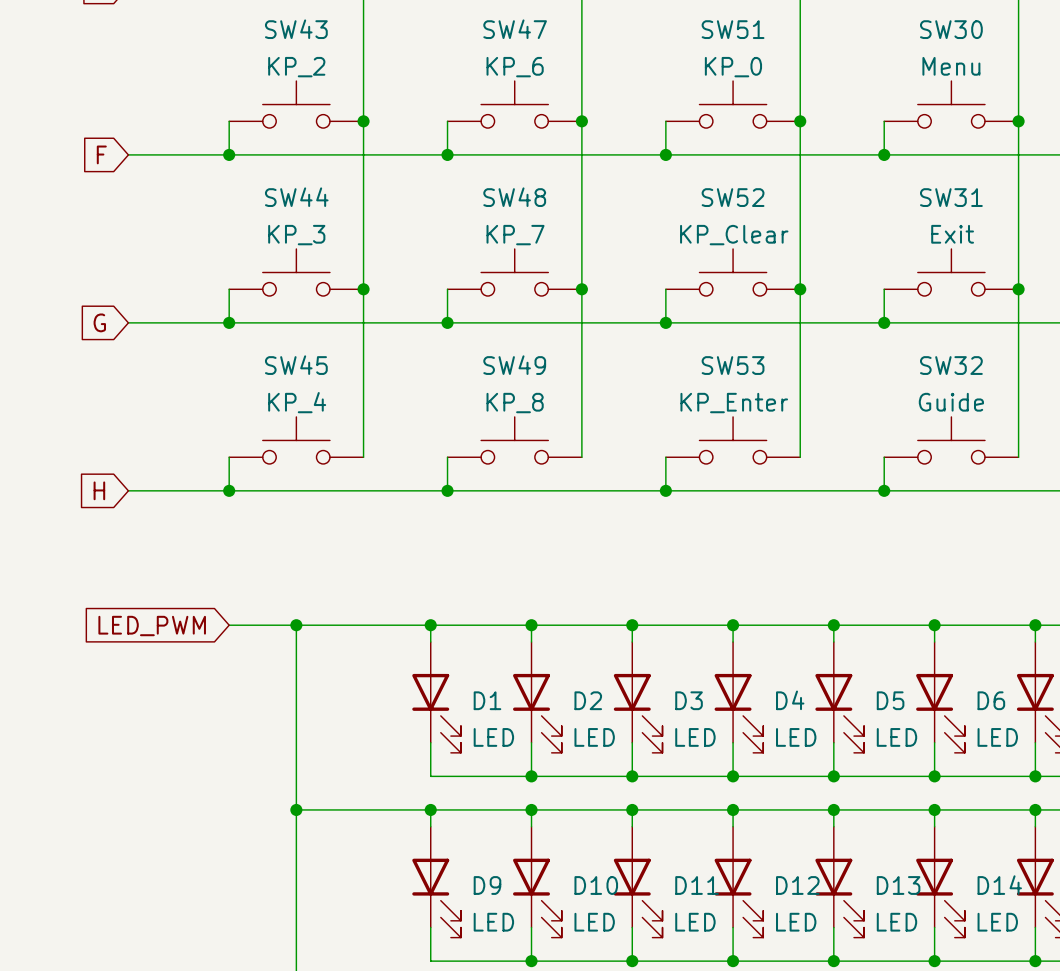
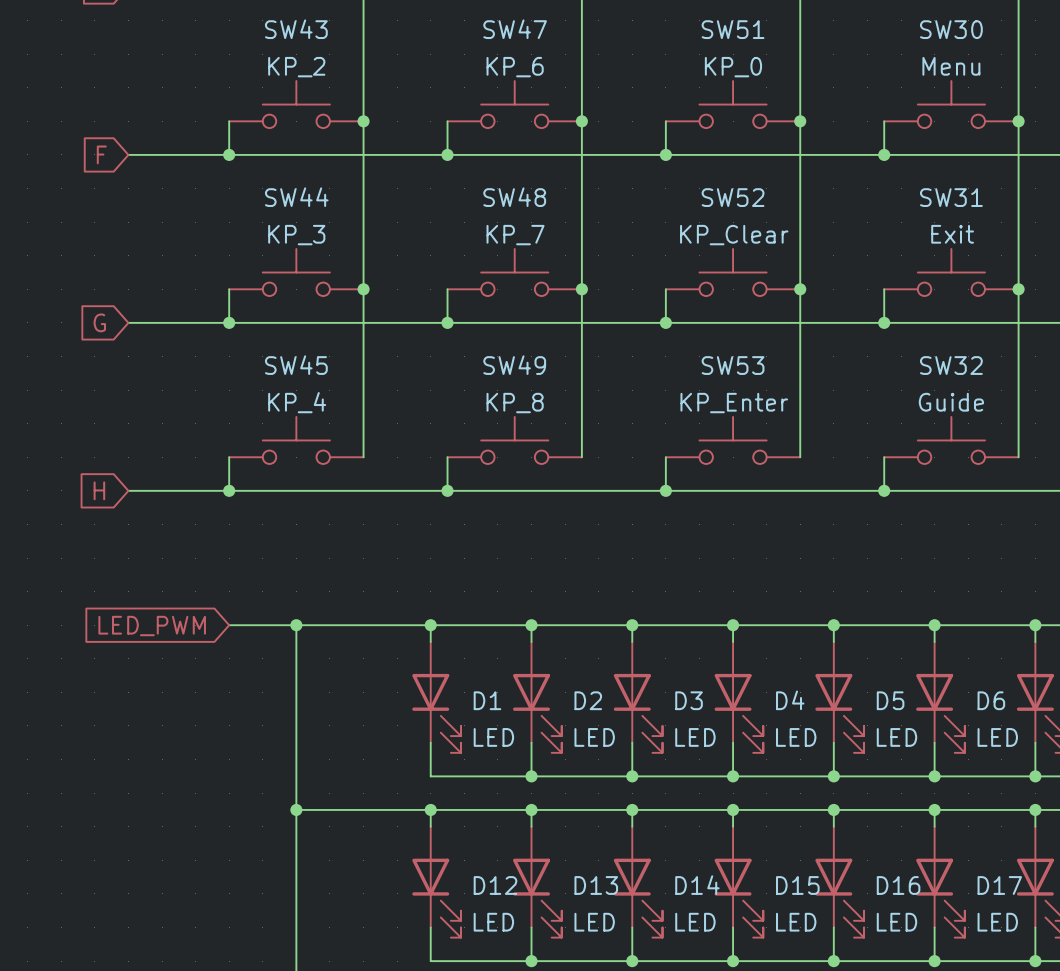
D9 name: D9 (487, 885) -> D12 (495, 885)
D10 name: D10 (596, 885) -> D13 (596, 885)
D11 name: D11 (697, 885) -> D14 (697, 885)
D12 name: D12 (797, 885) -> D15 (797, 885)
D13 name: D13 (898, 885) -> D16 (898, 885)
D14 name: D14 (999, 885) -> D17 (999, 885)

